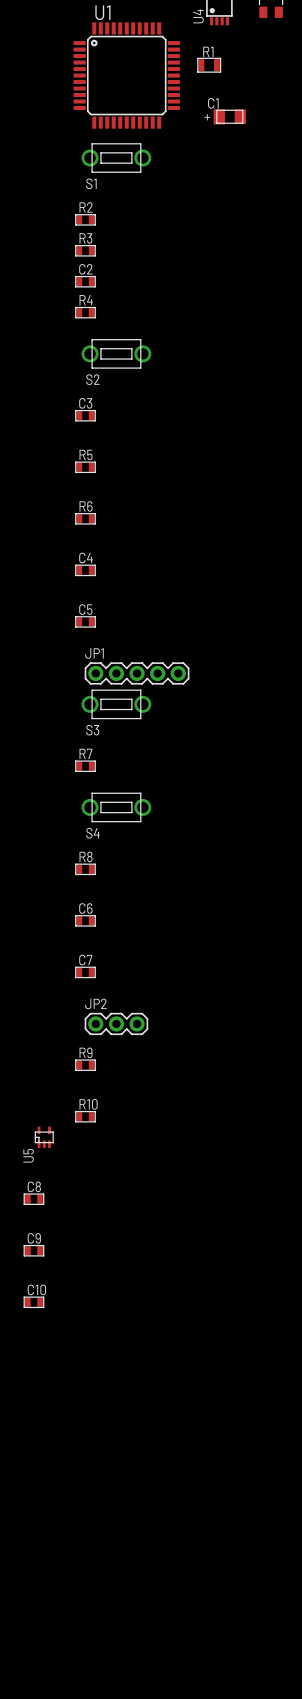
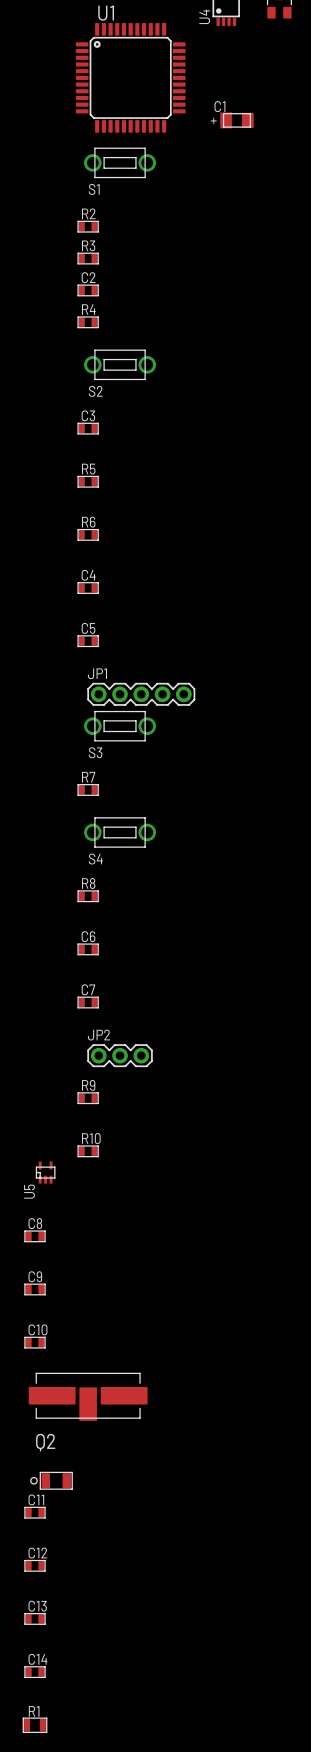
R1 position: (209, 65) -> (35, 1725)
part: none -> (88, 1396)
Q2: none -> (51, 1480)
C11: none -> (35, 1512)
C12: none -> (35, 1565)
C13: none -> (35, 1618)
C14: none -> (35, 1672)

